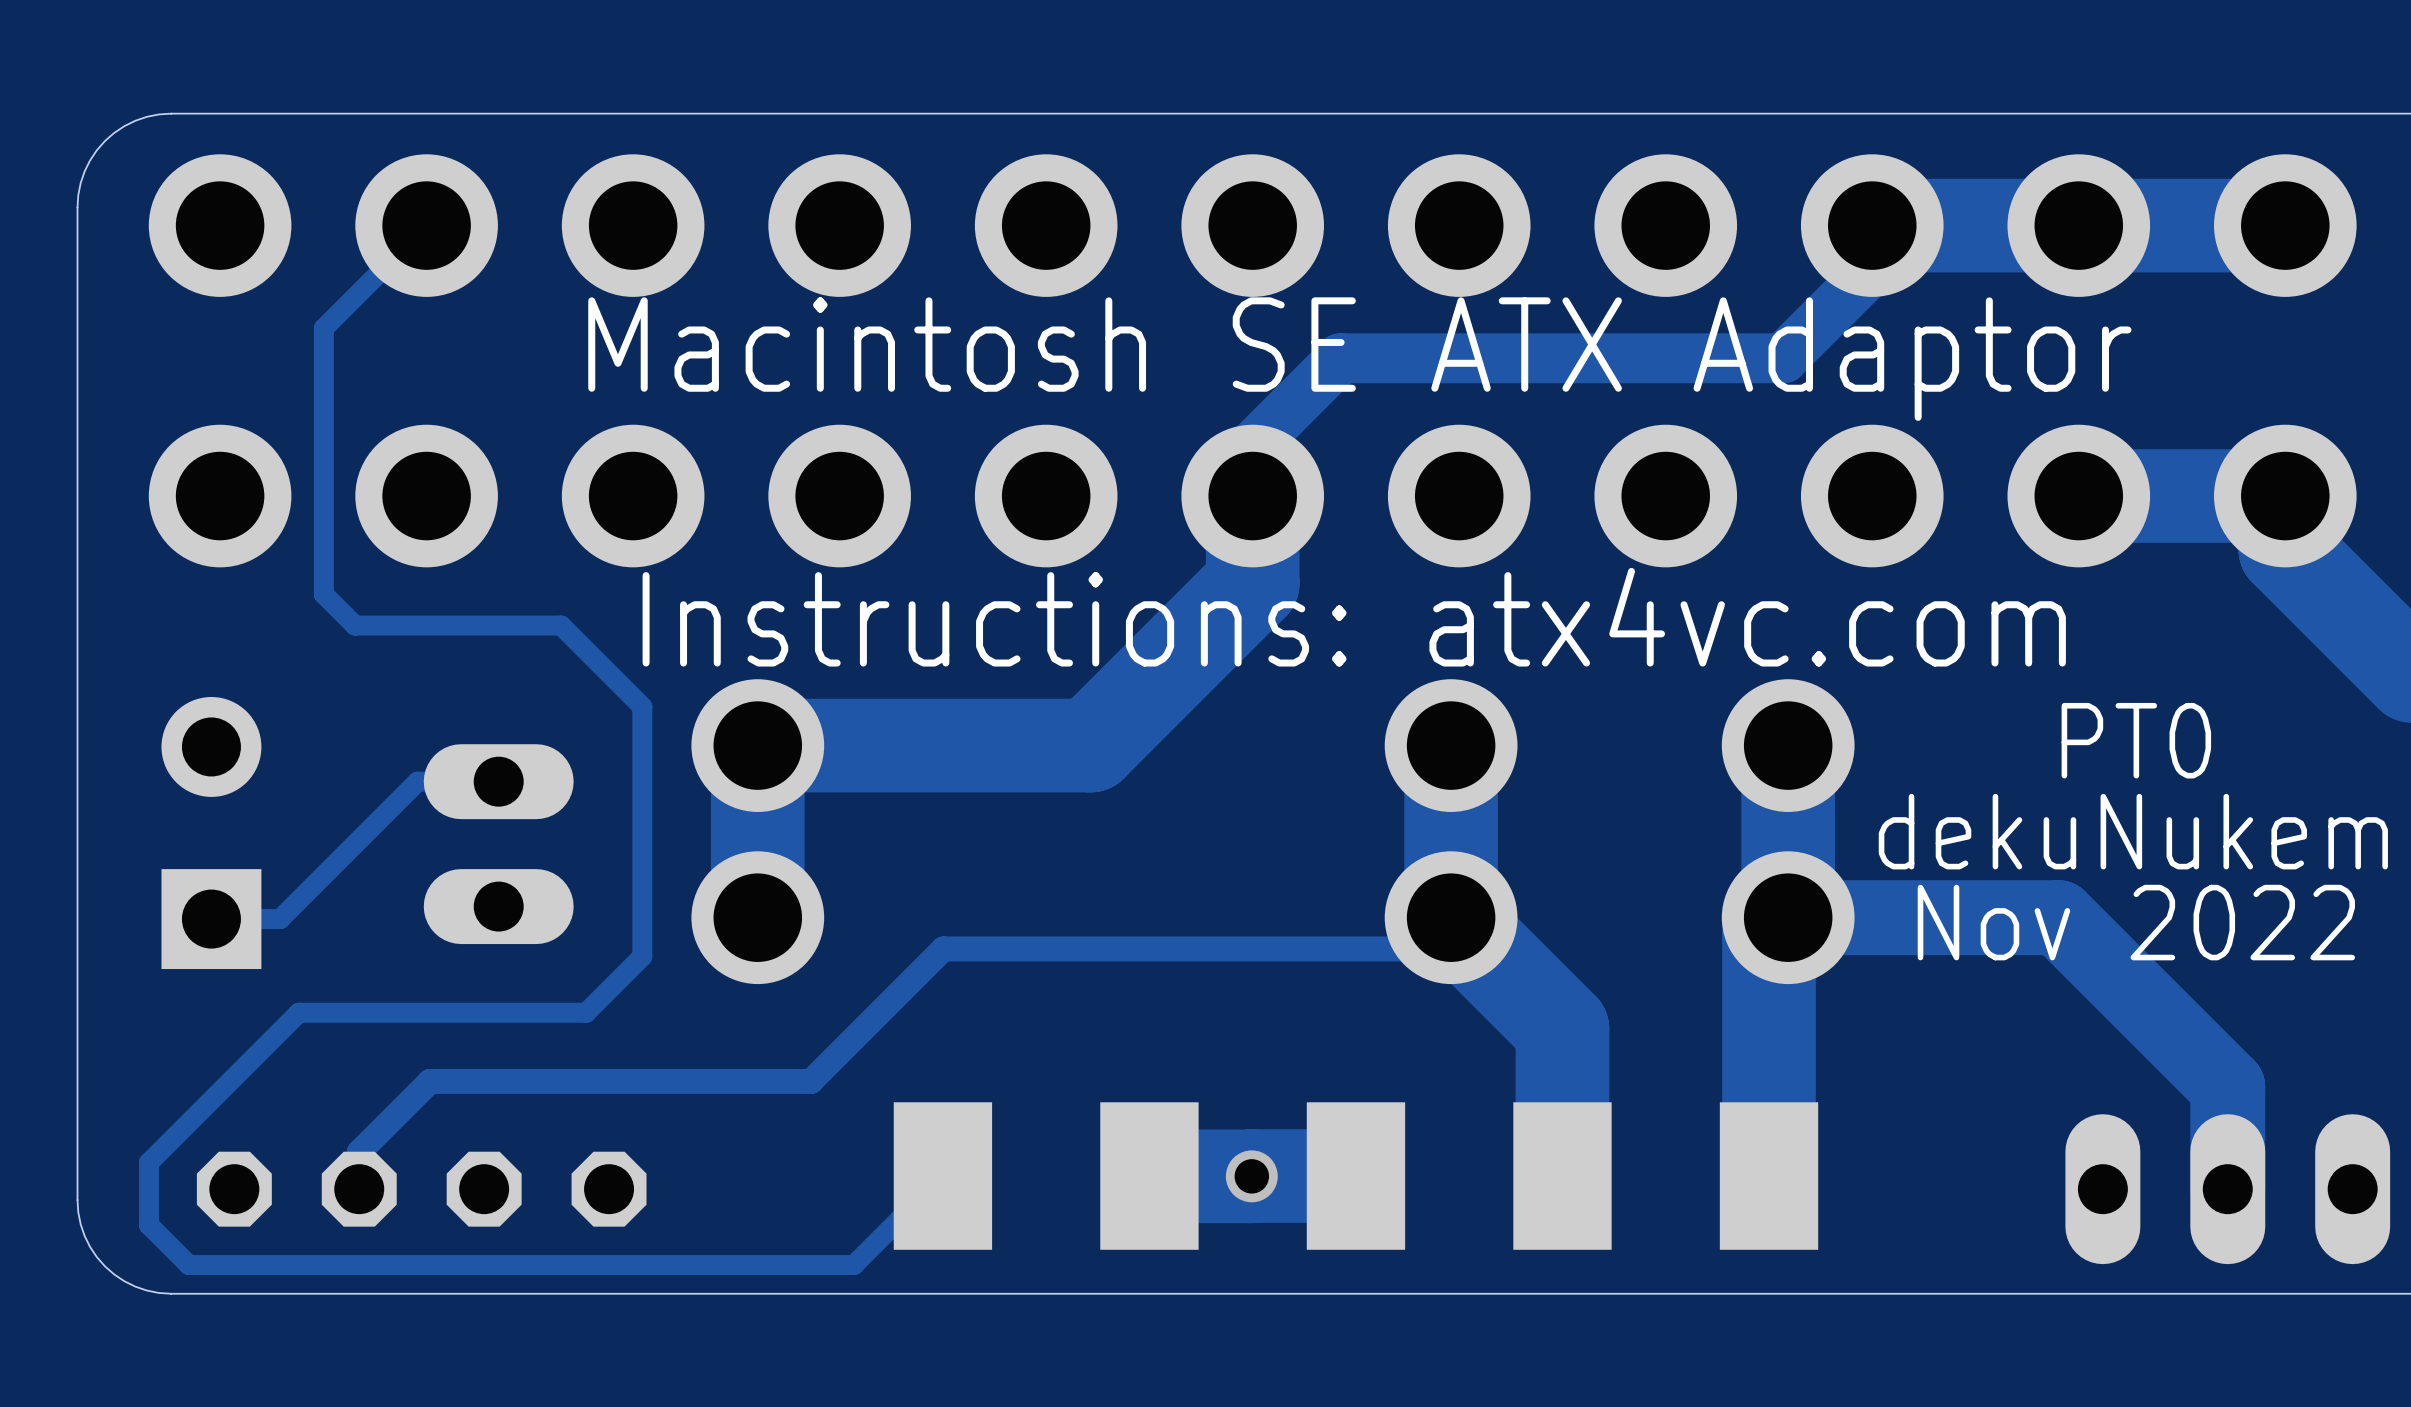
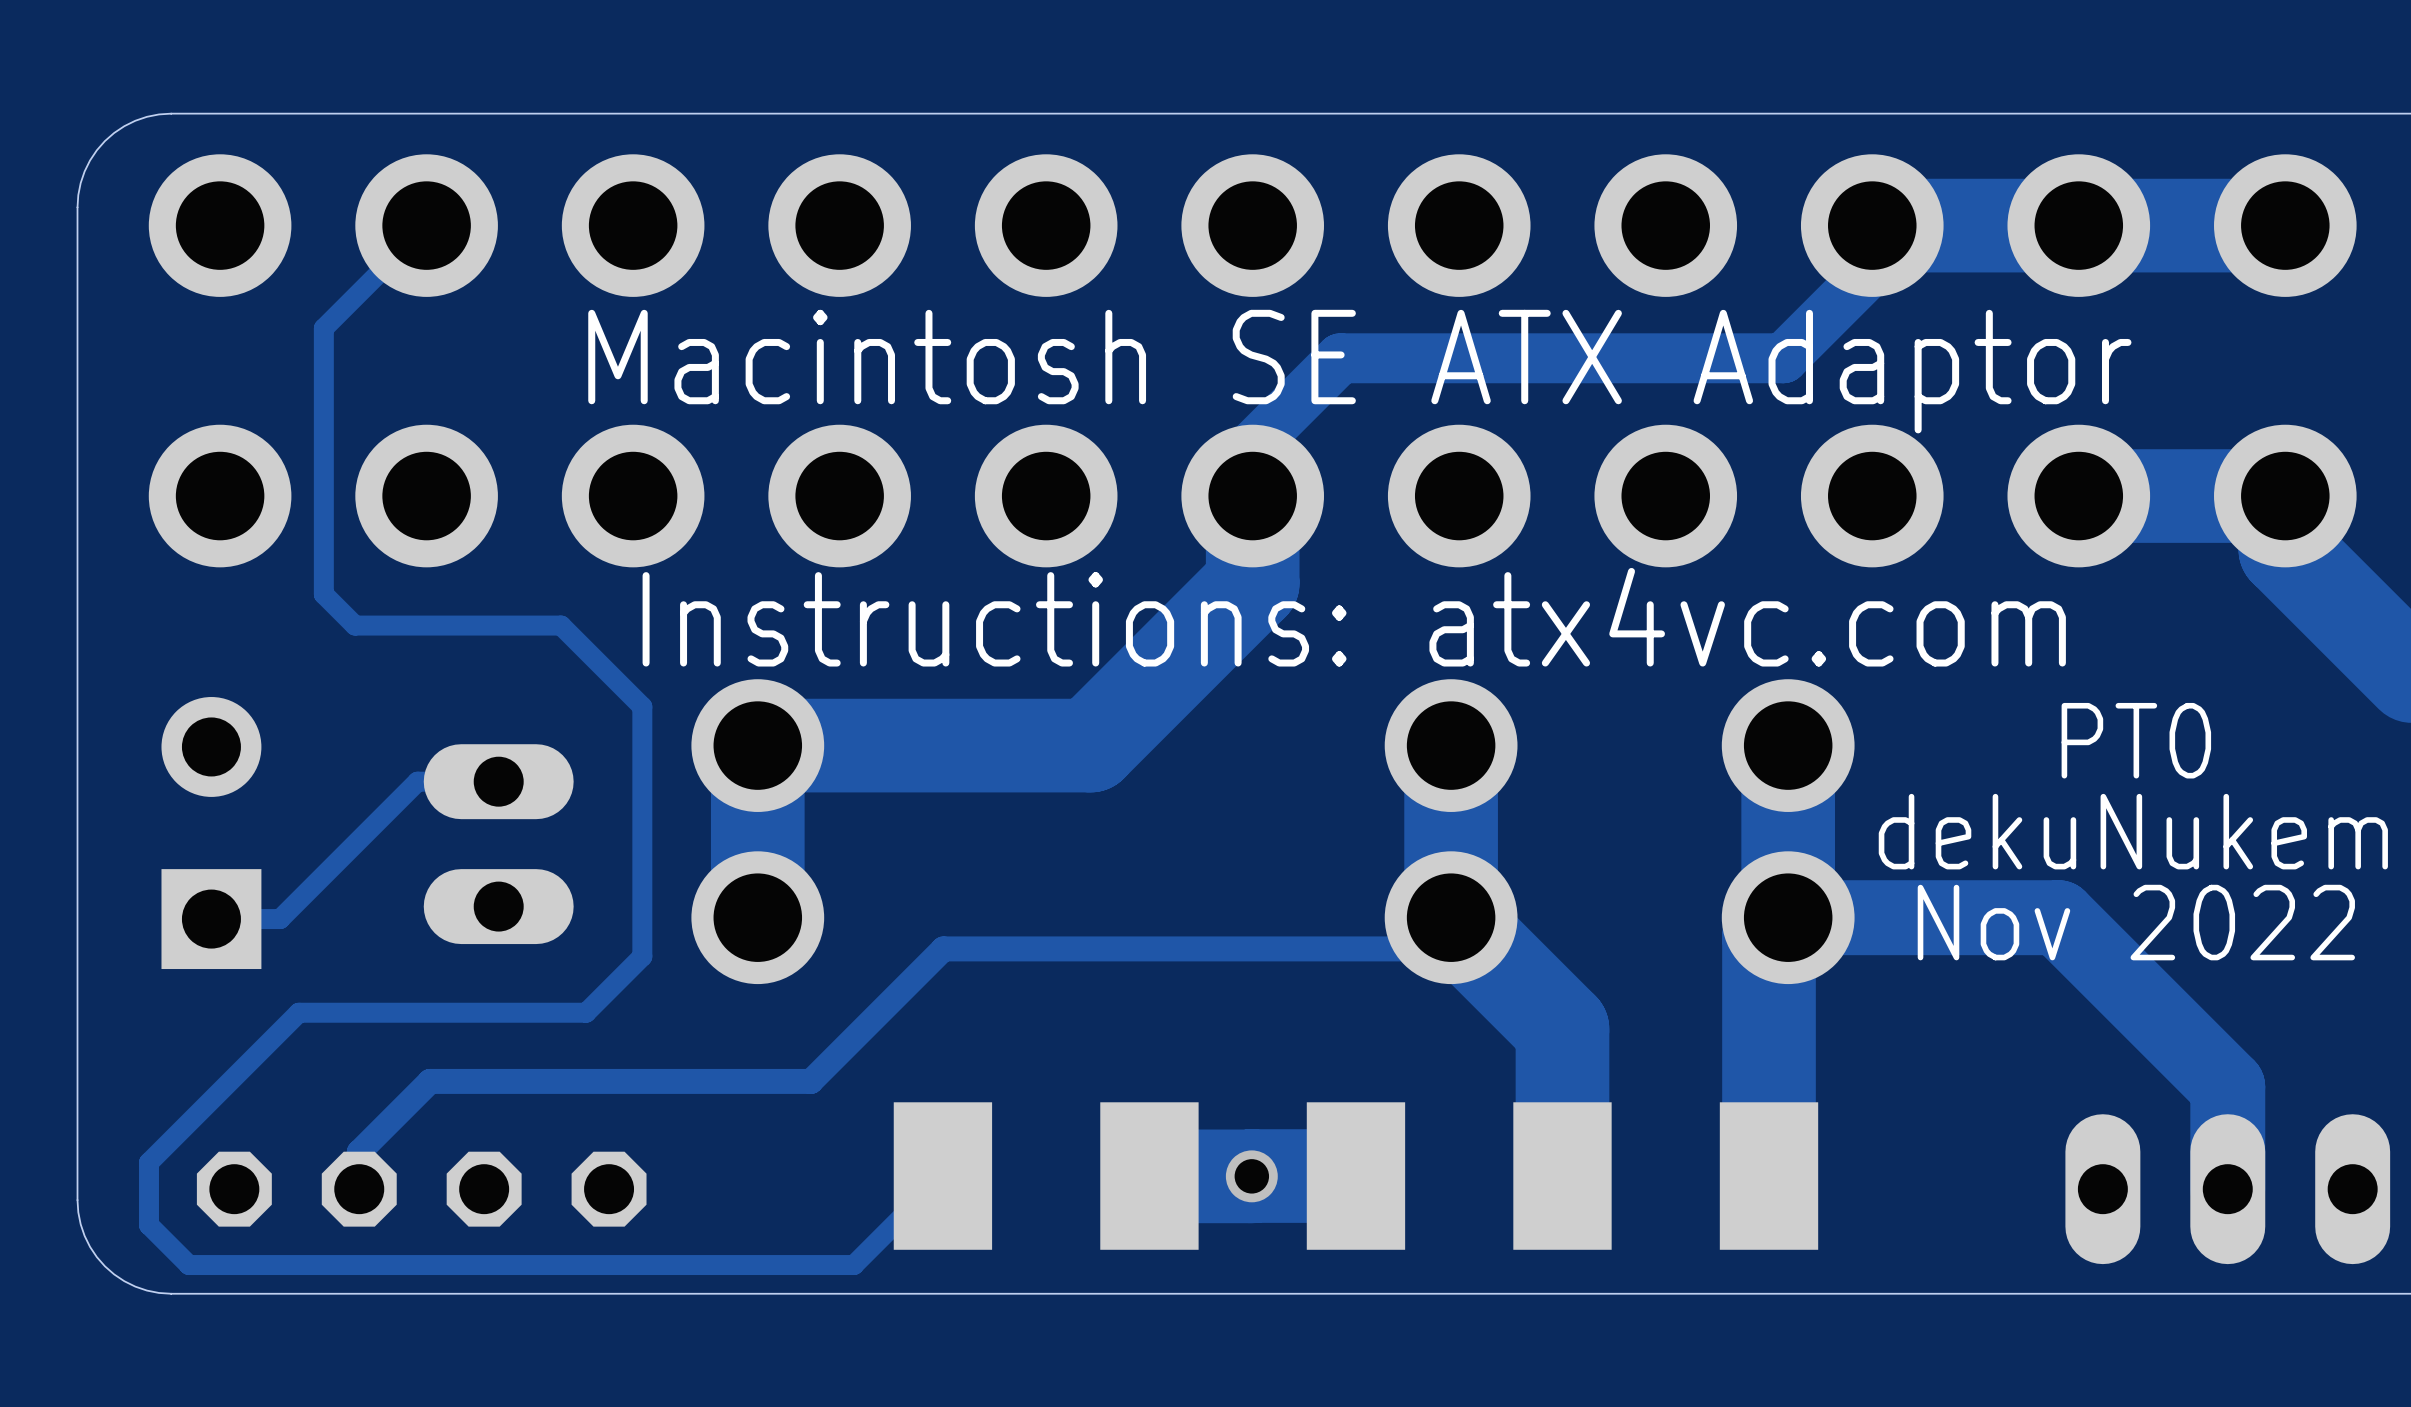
text position: Macintosh SE ATX Adaptor (1359, 359) -> Macintosh SE ATX Adaptor (1359, 371)

